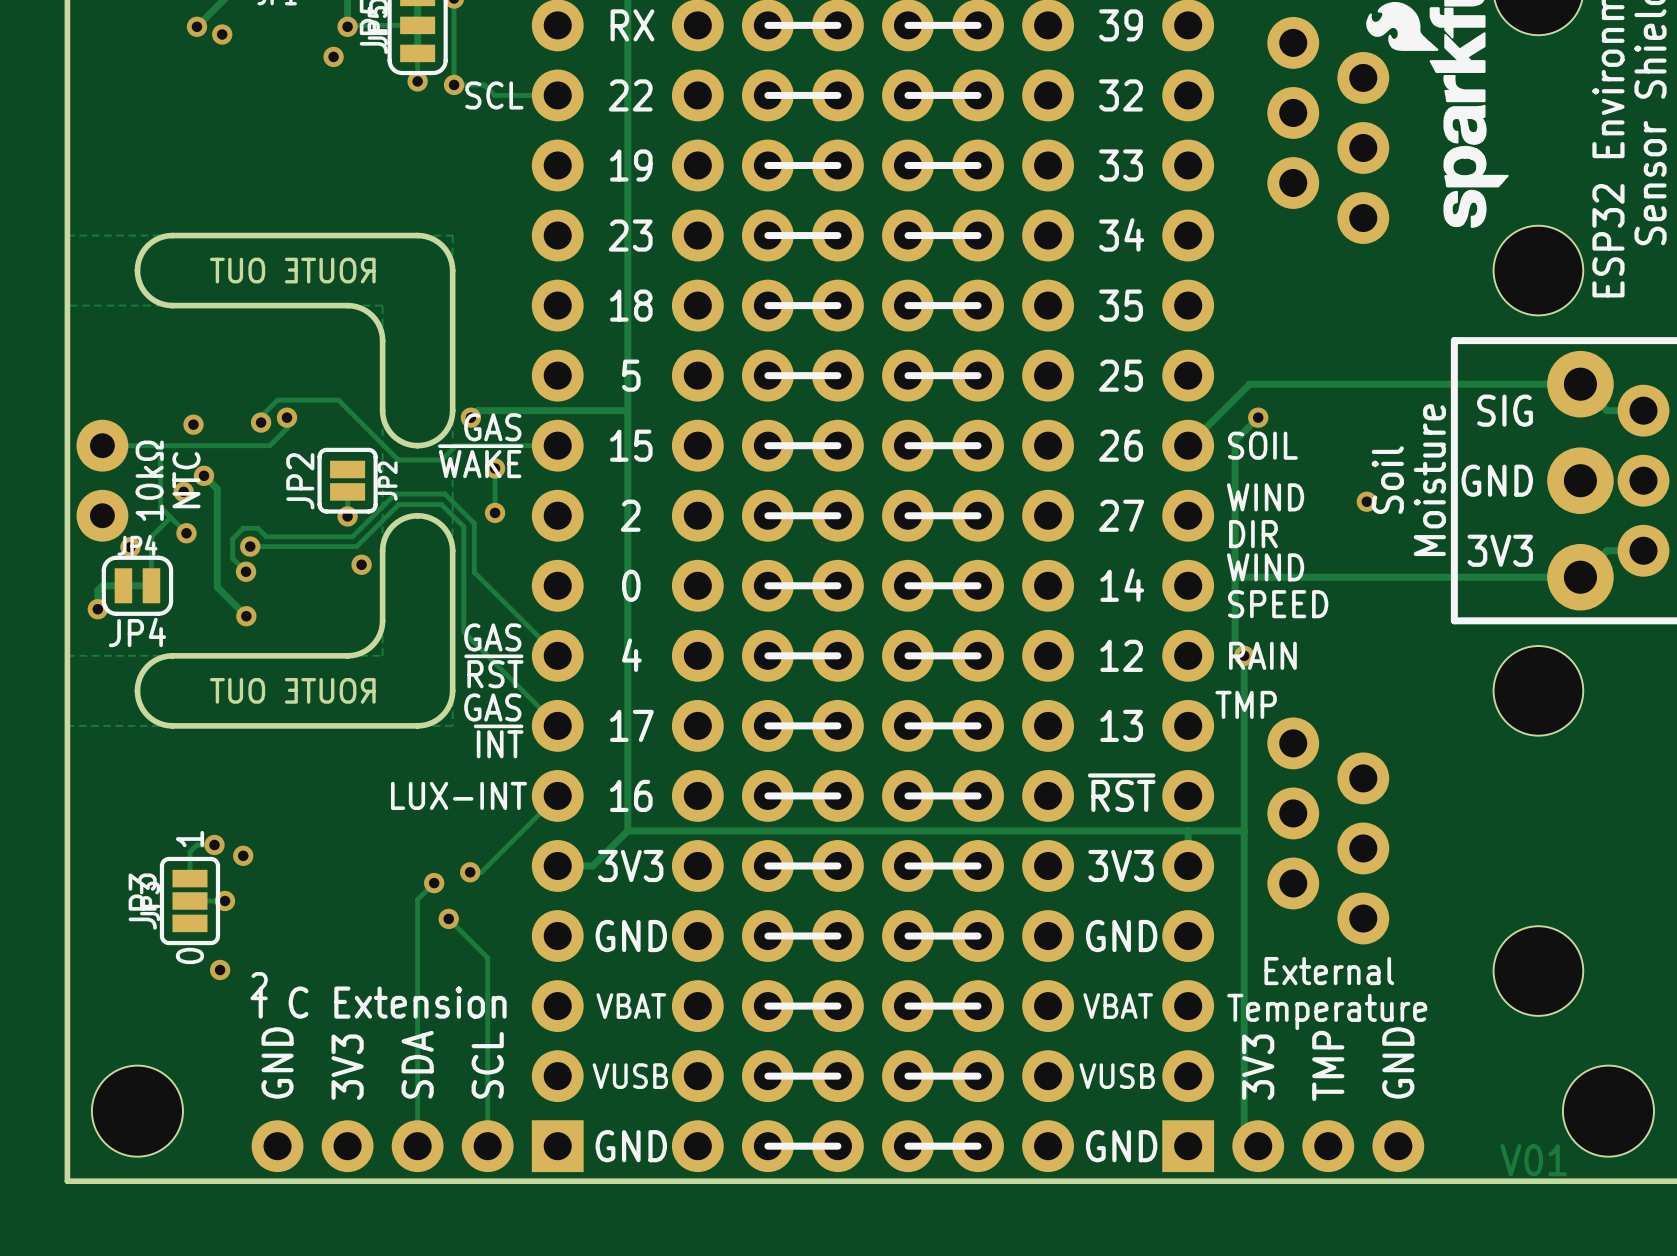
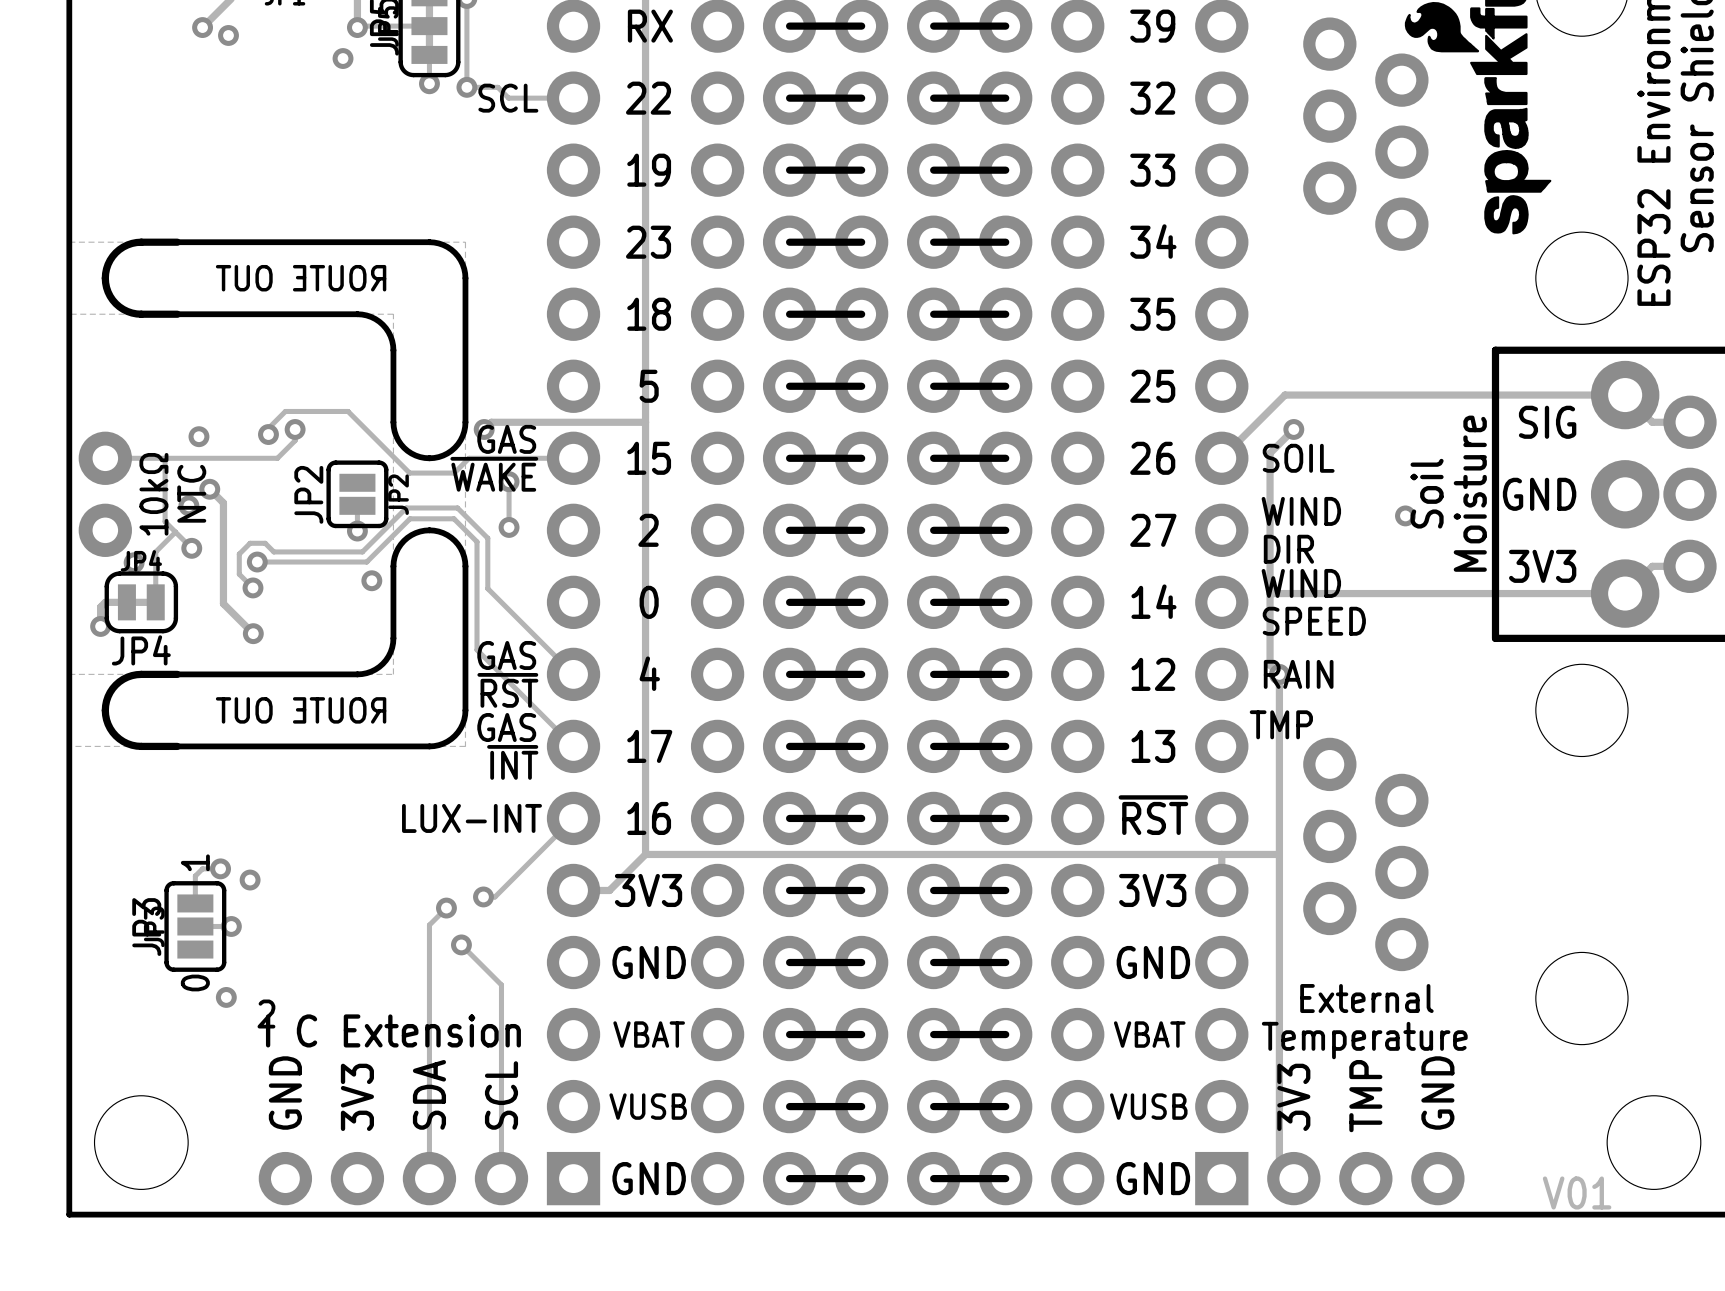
board edge: (172, 235) (159, 238) (147, 245) (140, 257) (137, 270) (140, 283) (147, 295) (159, 302) (172, 305) -> (177, 242) (136, 242) (123, 247) (110, 260) (105, 278) (110, 296) (123, 309) (136, 313) (177, 314)
board edge: (172, 655) (159, 658) (147, 666) (140, 677) (137, 690) (140, 704) (147, 715) (159, 723) (172, 725) -> (177, 674) (136, 674) (123, 679) (110, 692) (105, 710) (110, 728) (123, 741) (136, 746) (177, 746)

